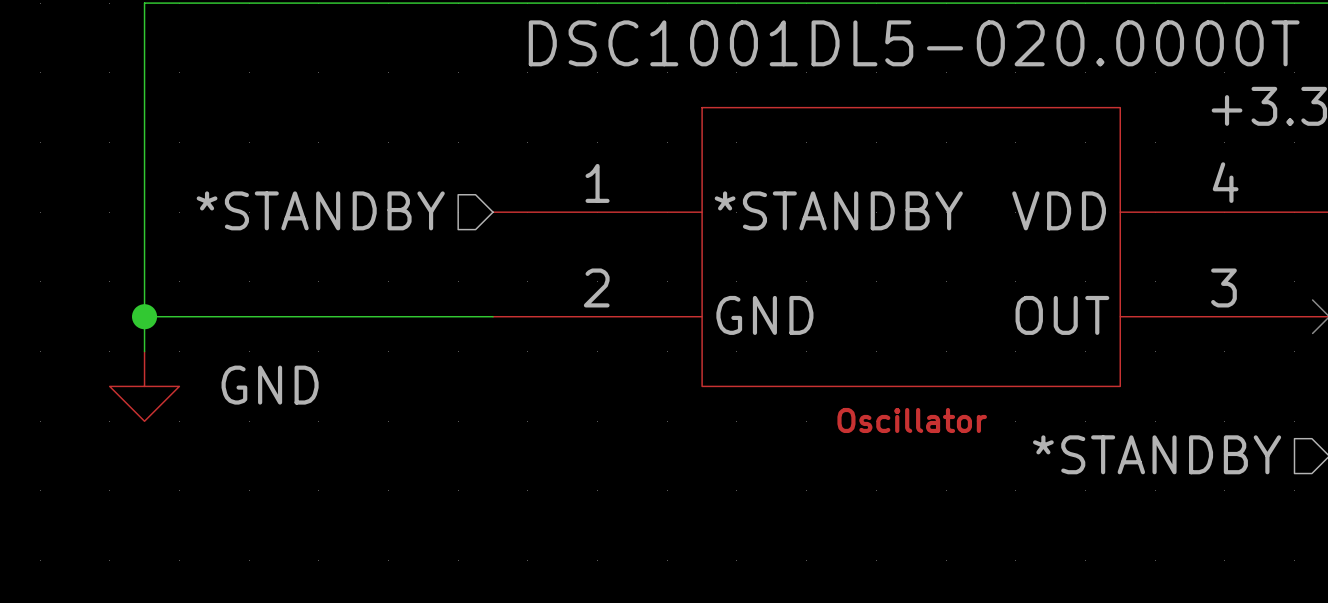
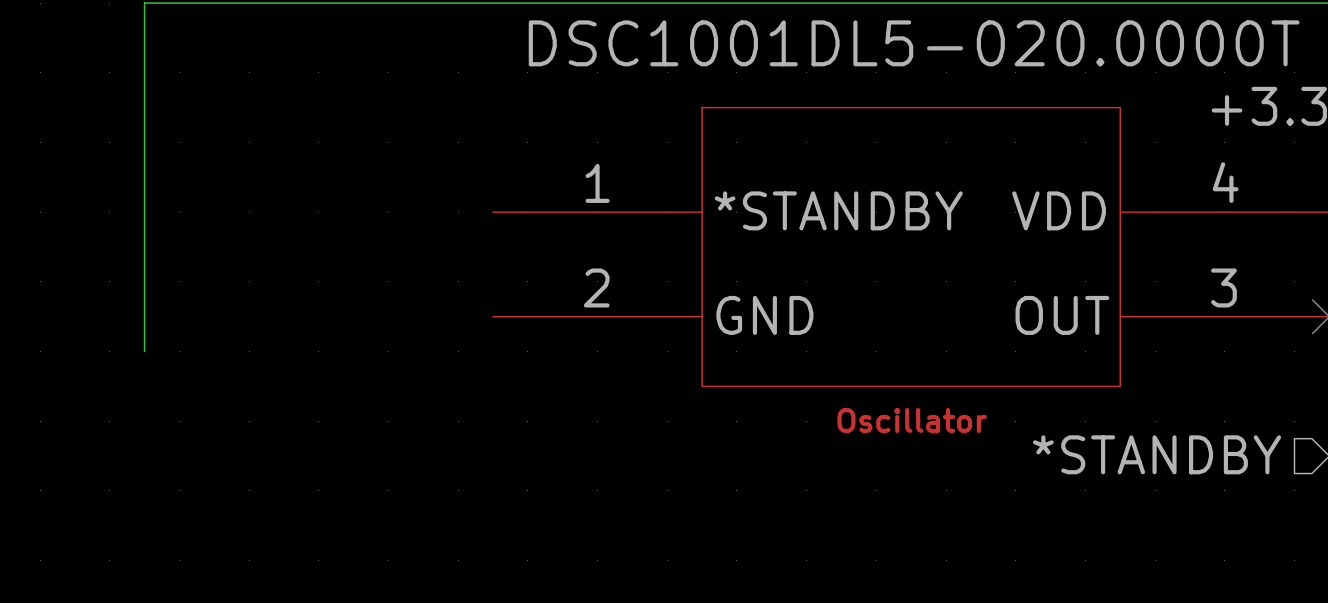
hierarchical label: *STANDBY (320, 210) -> none
wire: (144, 316) (493, 316) -> none
junction: (144, 316) -> none
power symbol: GND (144, 386) -> none

